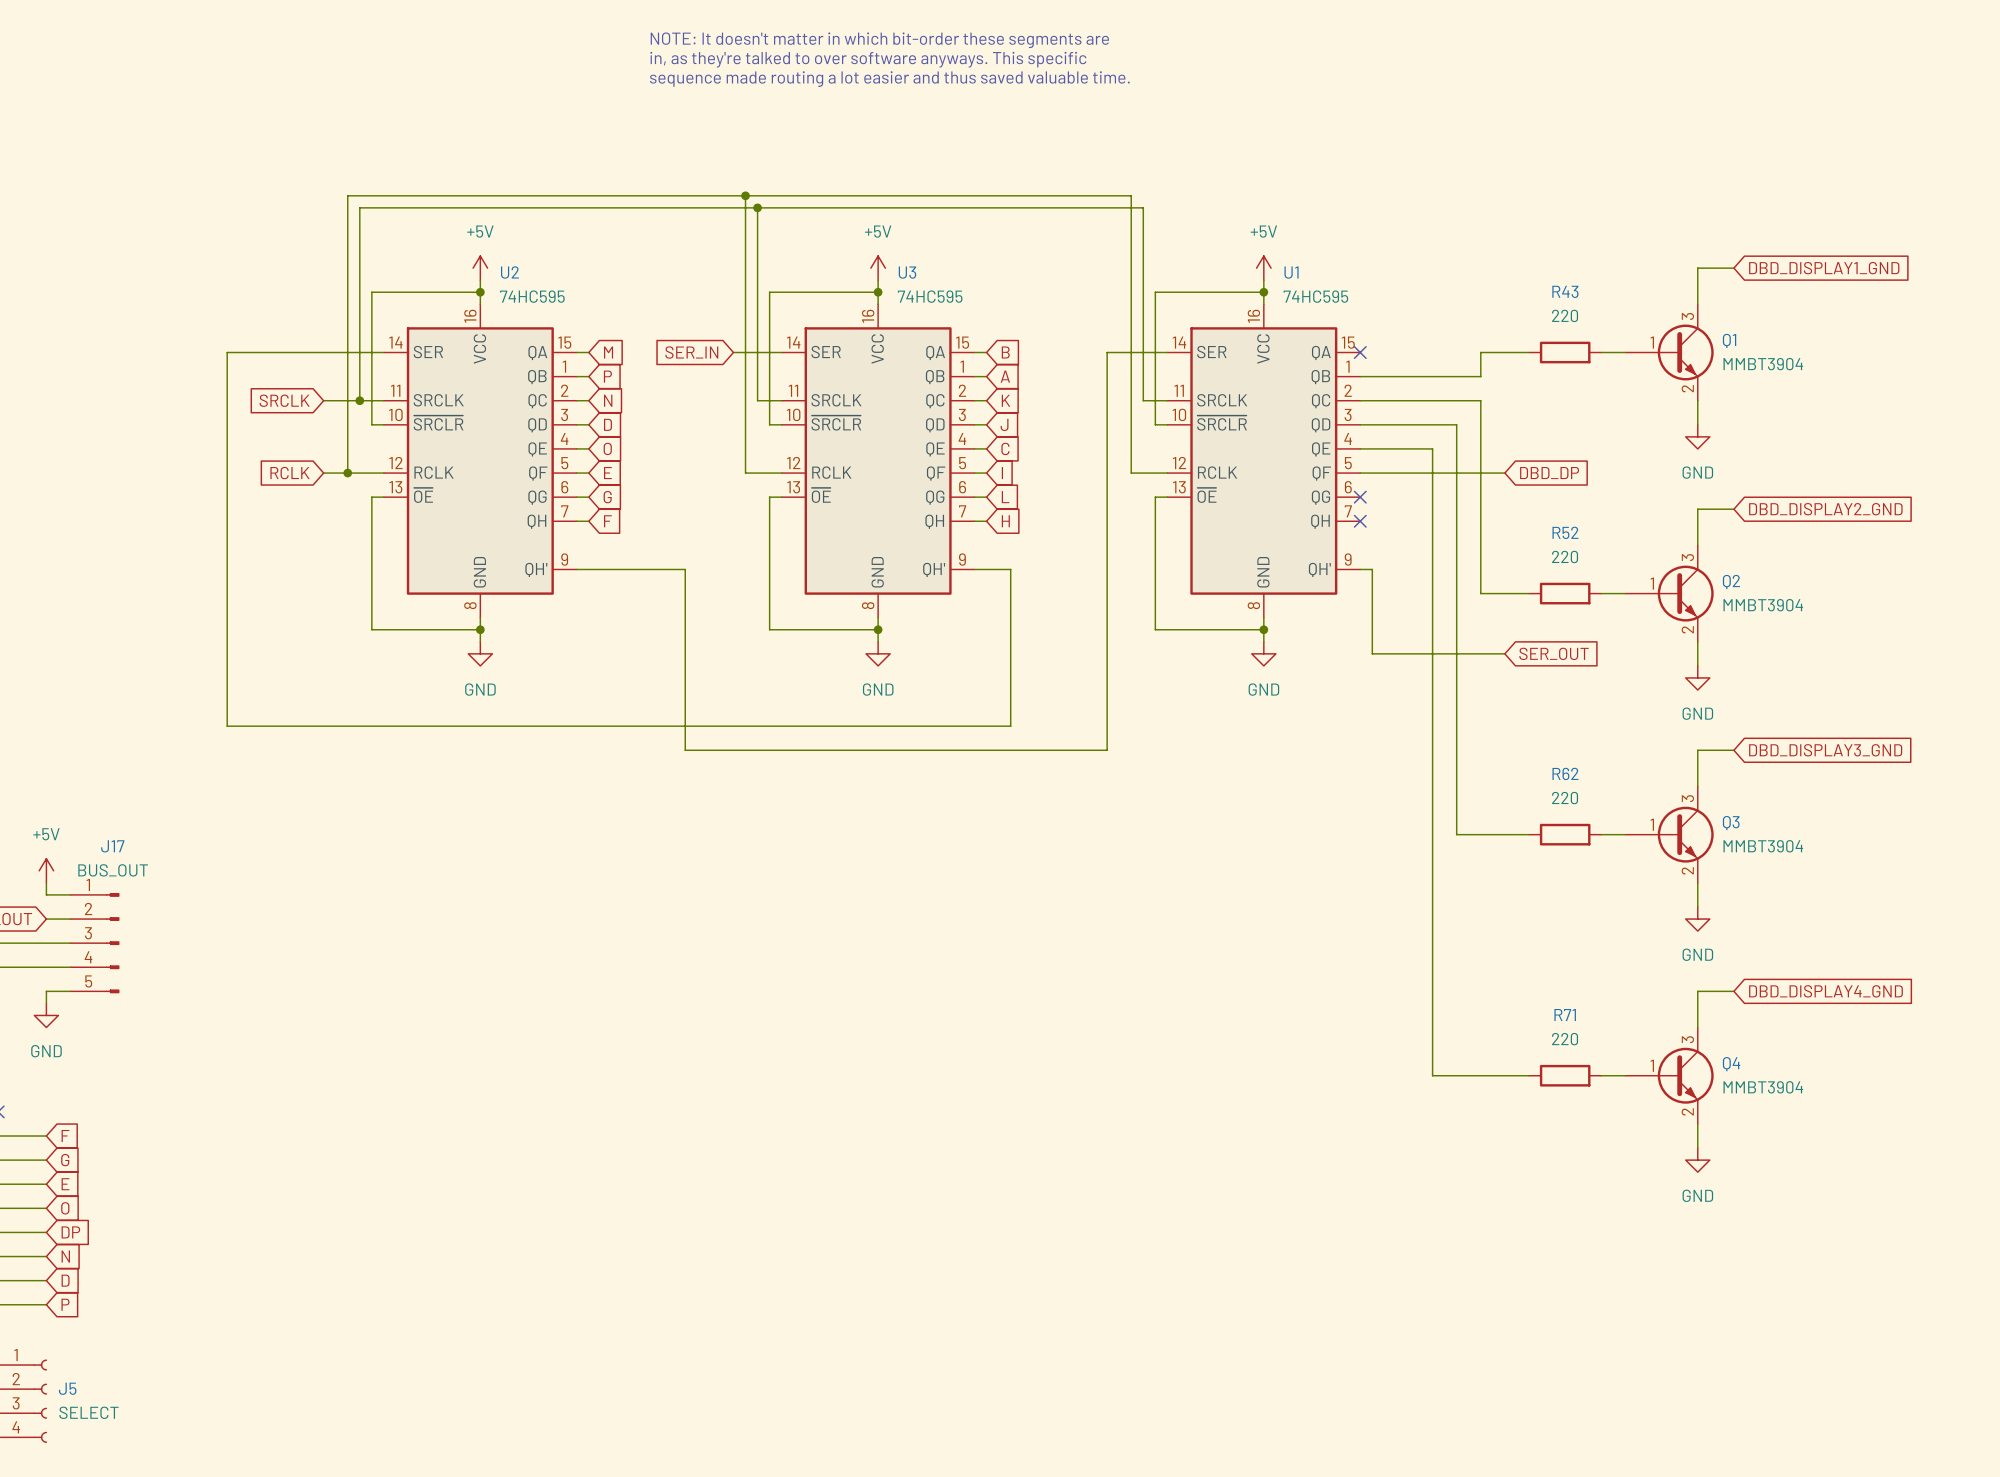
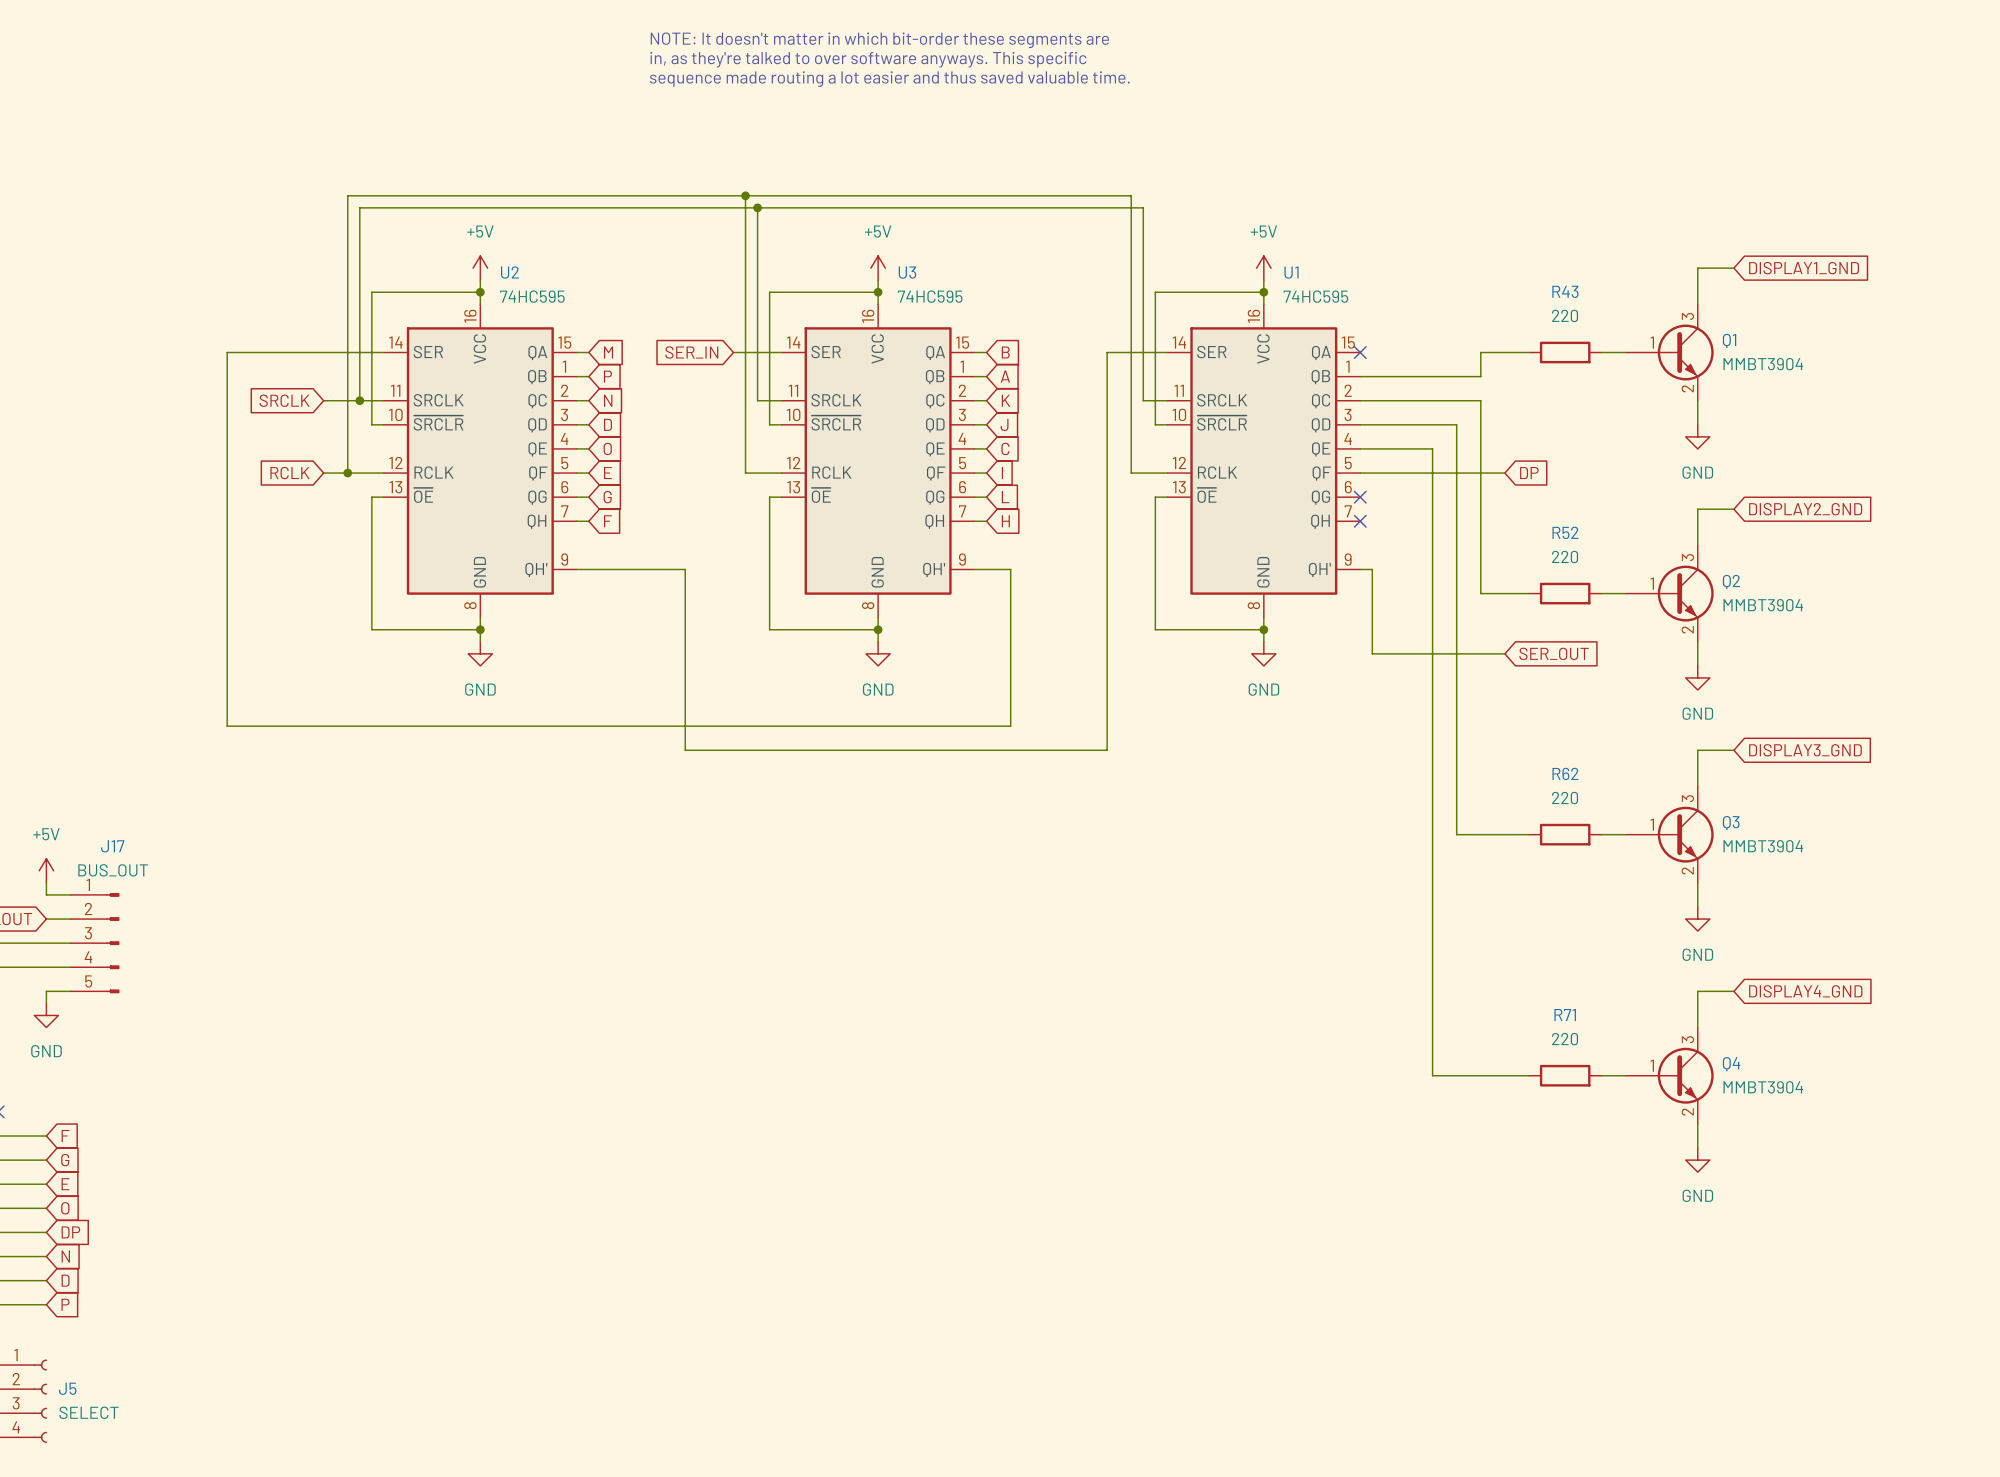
global label: DBD_DISPLAY1_GND (1824, 268) -> DISPLAY1_GND (1804, 268)
global label: DBD_DP (1549, 473) -> DP (1529, 473)
global label: DBD_DISPLAY2_GND (1825, 509) -> DISPLAY2_GND (1805, 509)
global label: DBD_DISPLAY3_GND (1825, 750) -> DISPLAY3_GND (1805, 750)
global label: DBD_DISPLAY4_GND (1825, 991) -> DISPLAY4_GND (1805, 991)

